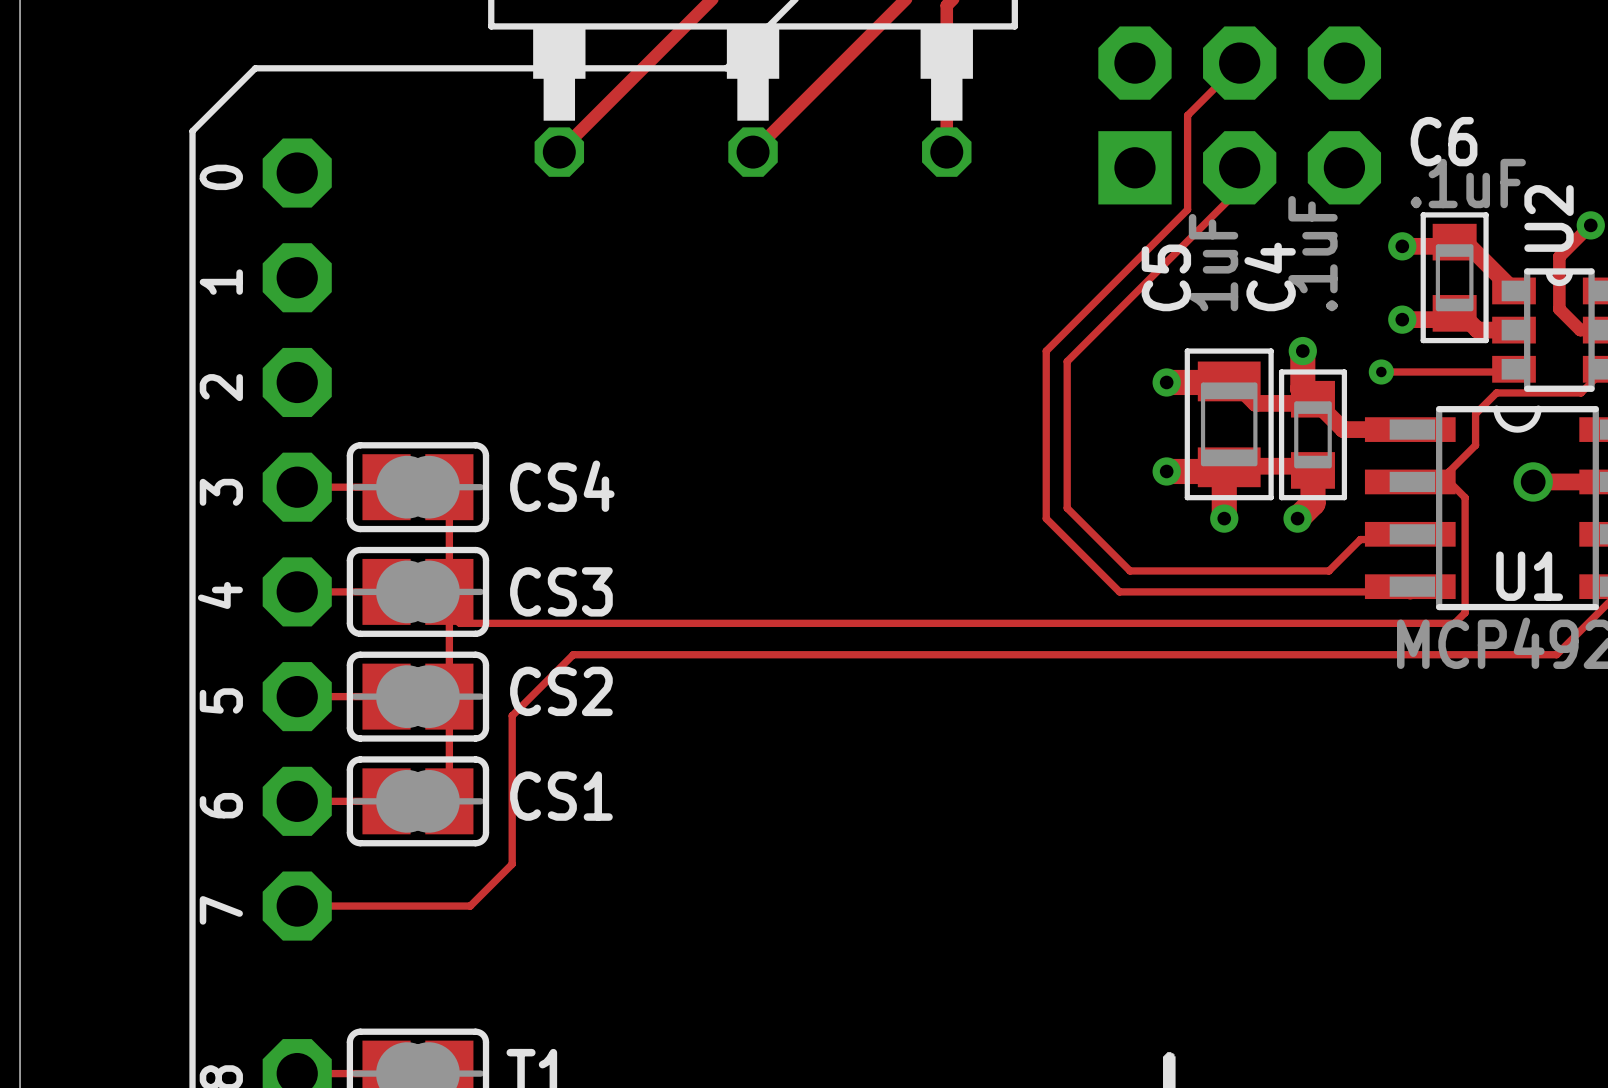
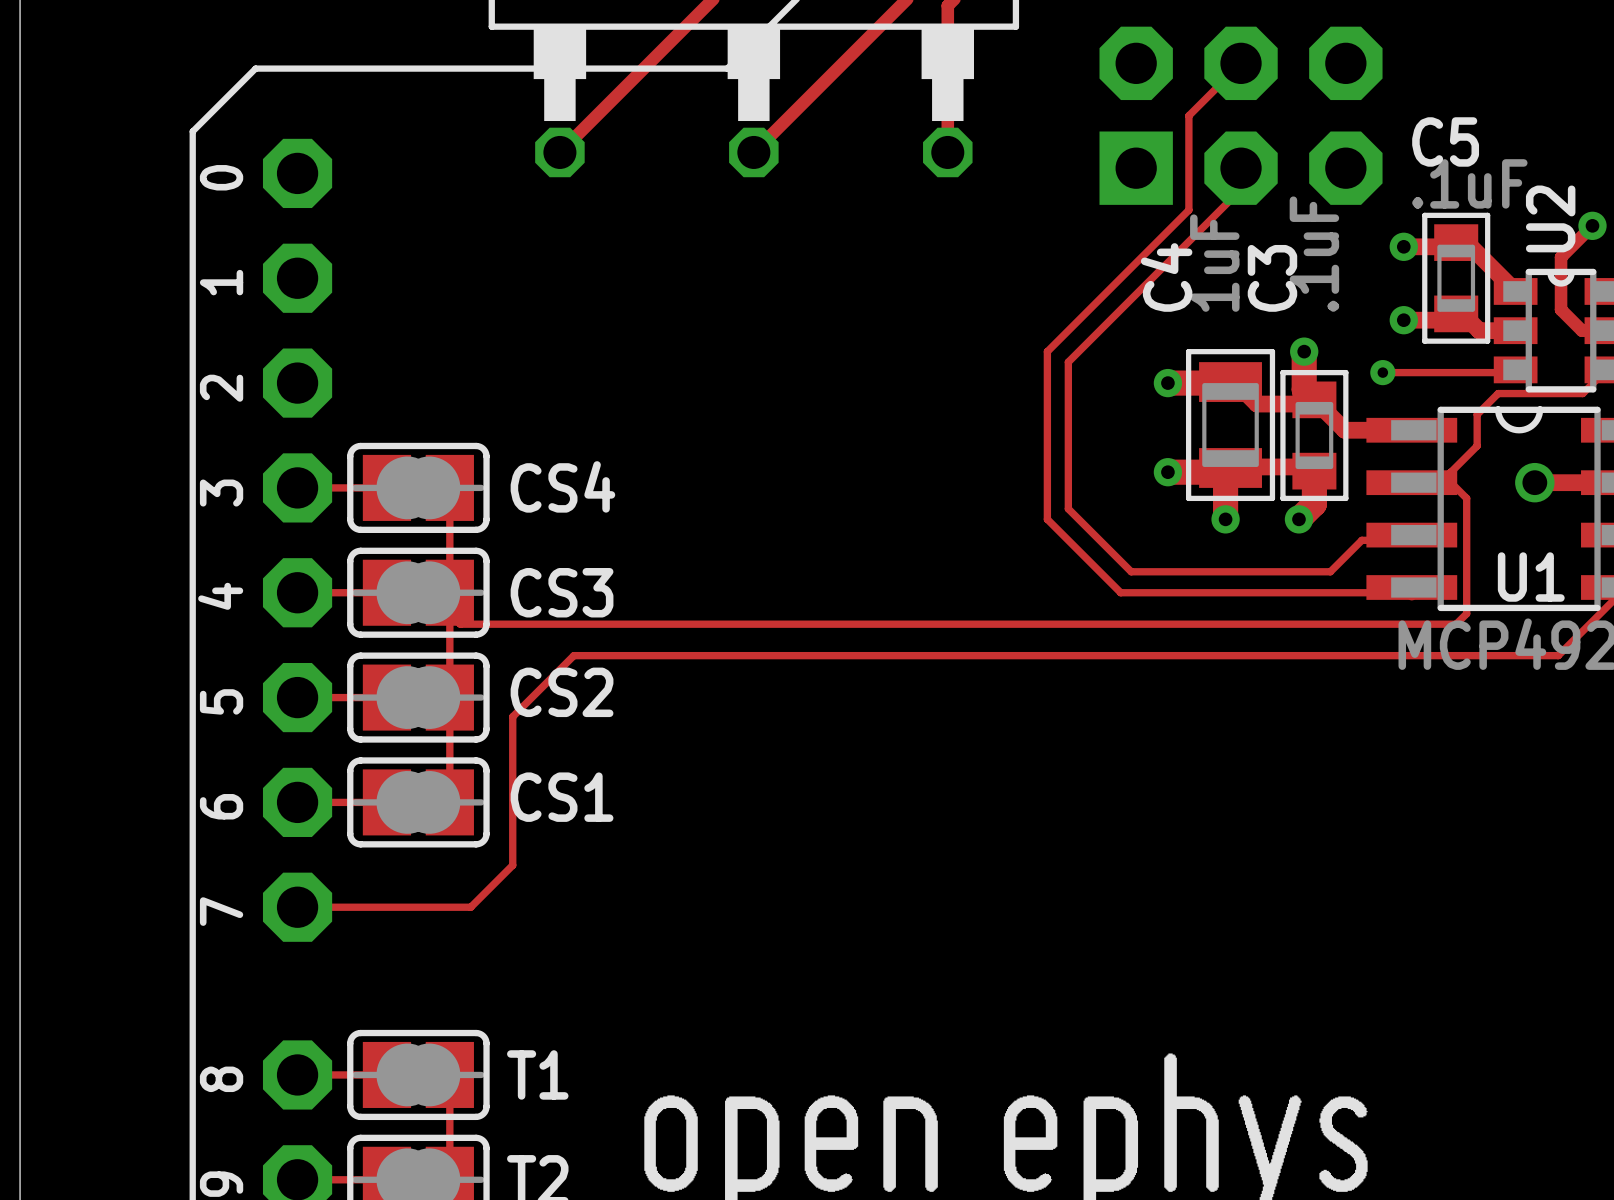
C6 name: C6 (1444, 141) -> C5 (1445, 141)
C4 name: C4 (1270, 276) -> C3 (1272, 278)
C5 name: C5 (1166, 277) -> C4 (1166, 277)

